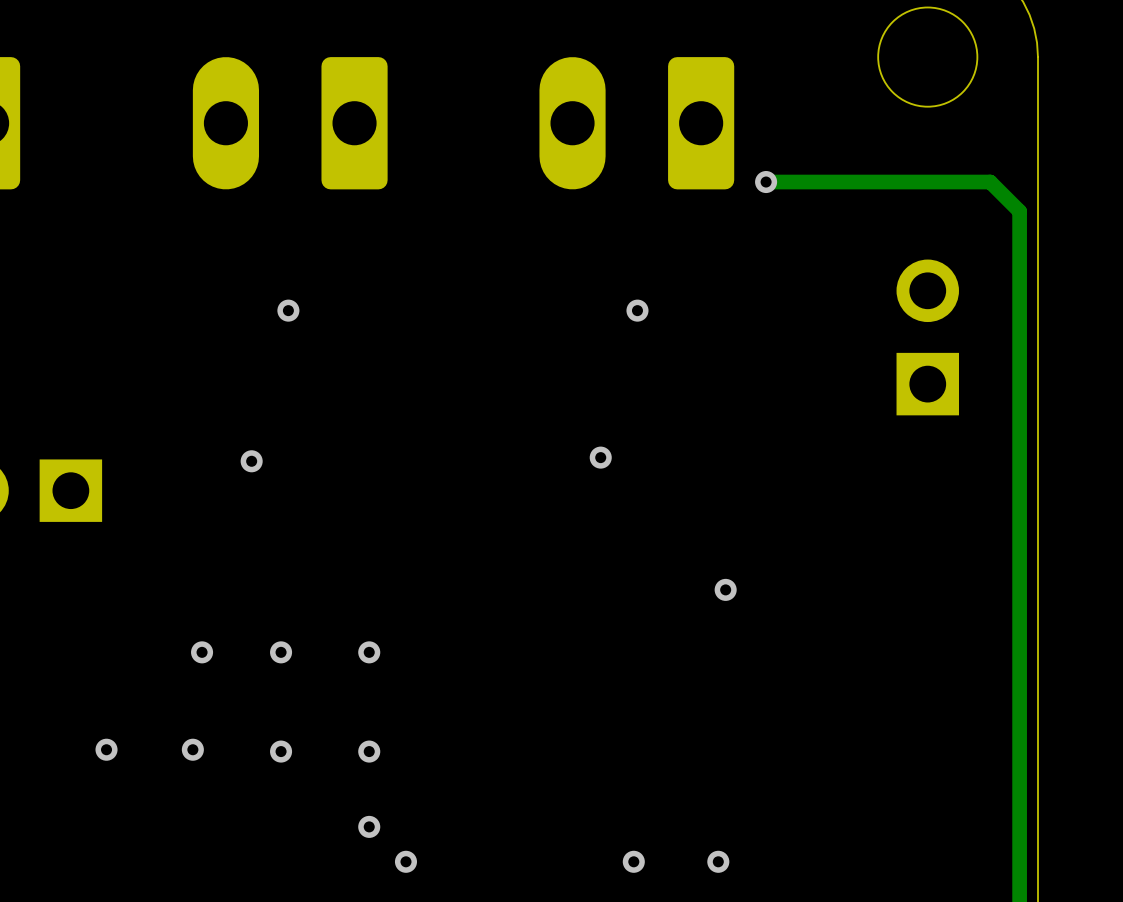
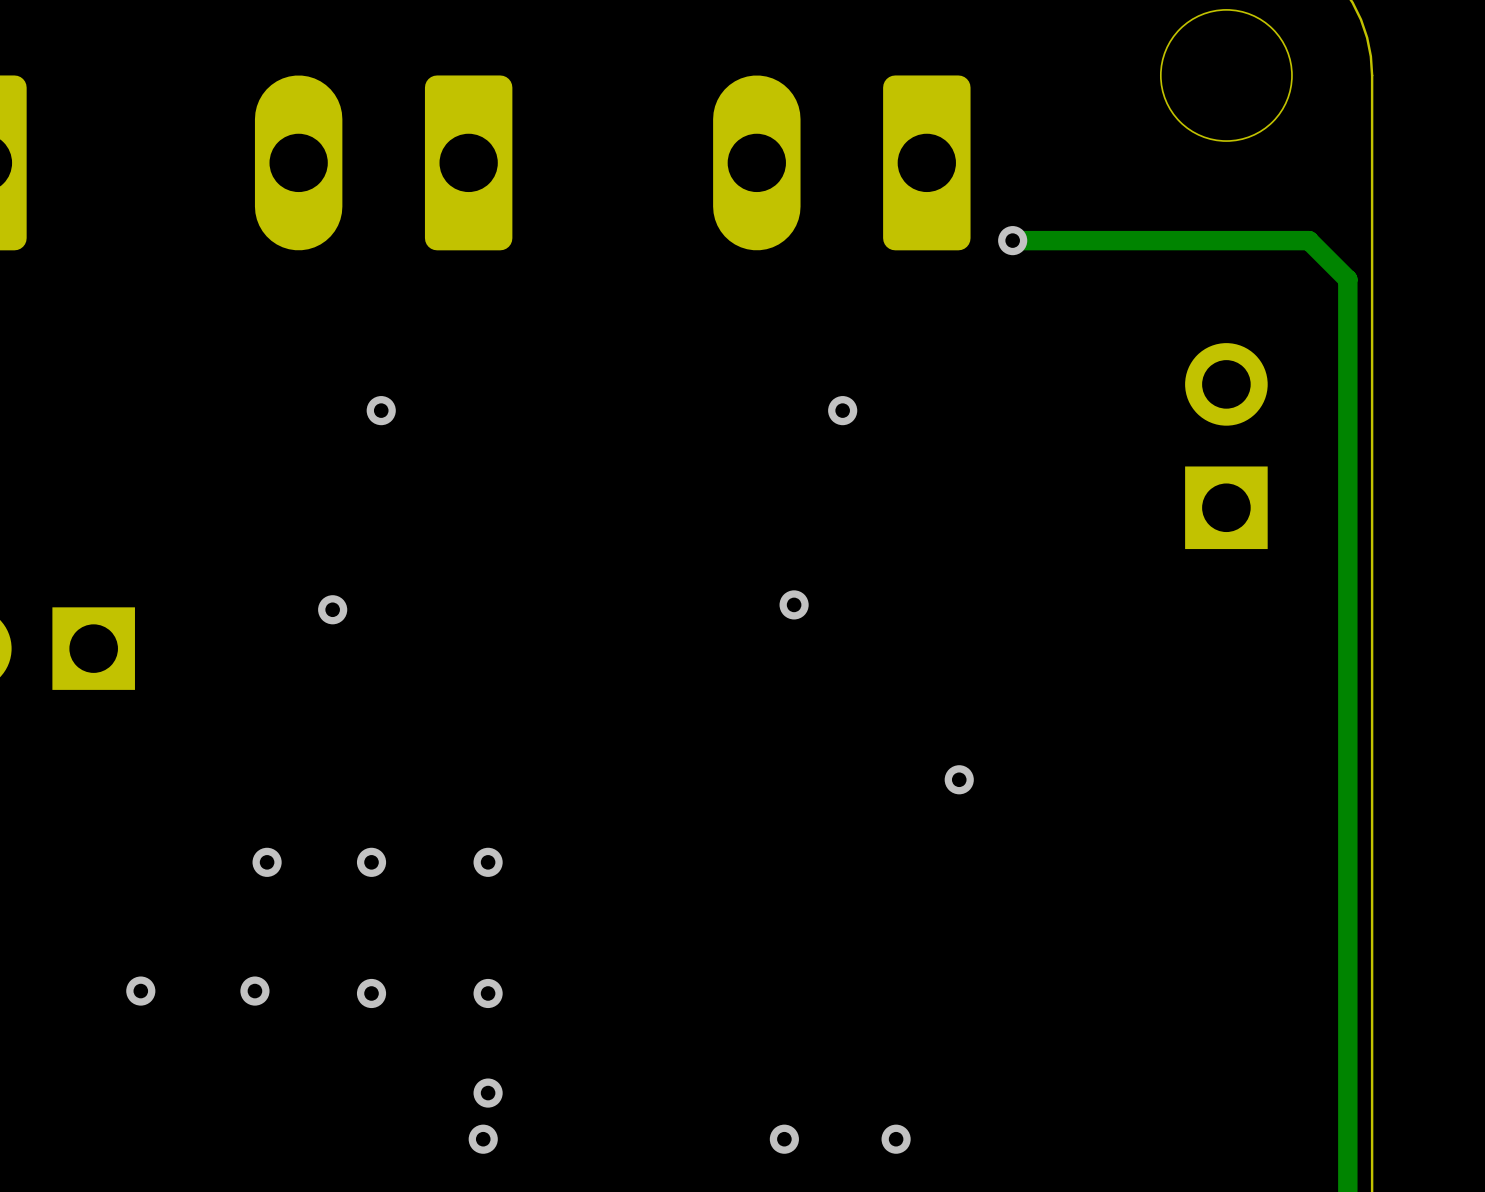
via position: (405, 861) -> (483, 1139)
via: none -> (784, 1139)
via: (633, 861) -> none
via: none -> (896, 1139)
via: (718, 861) -> none

